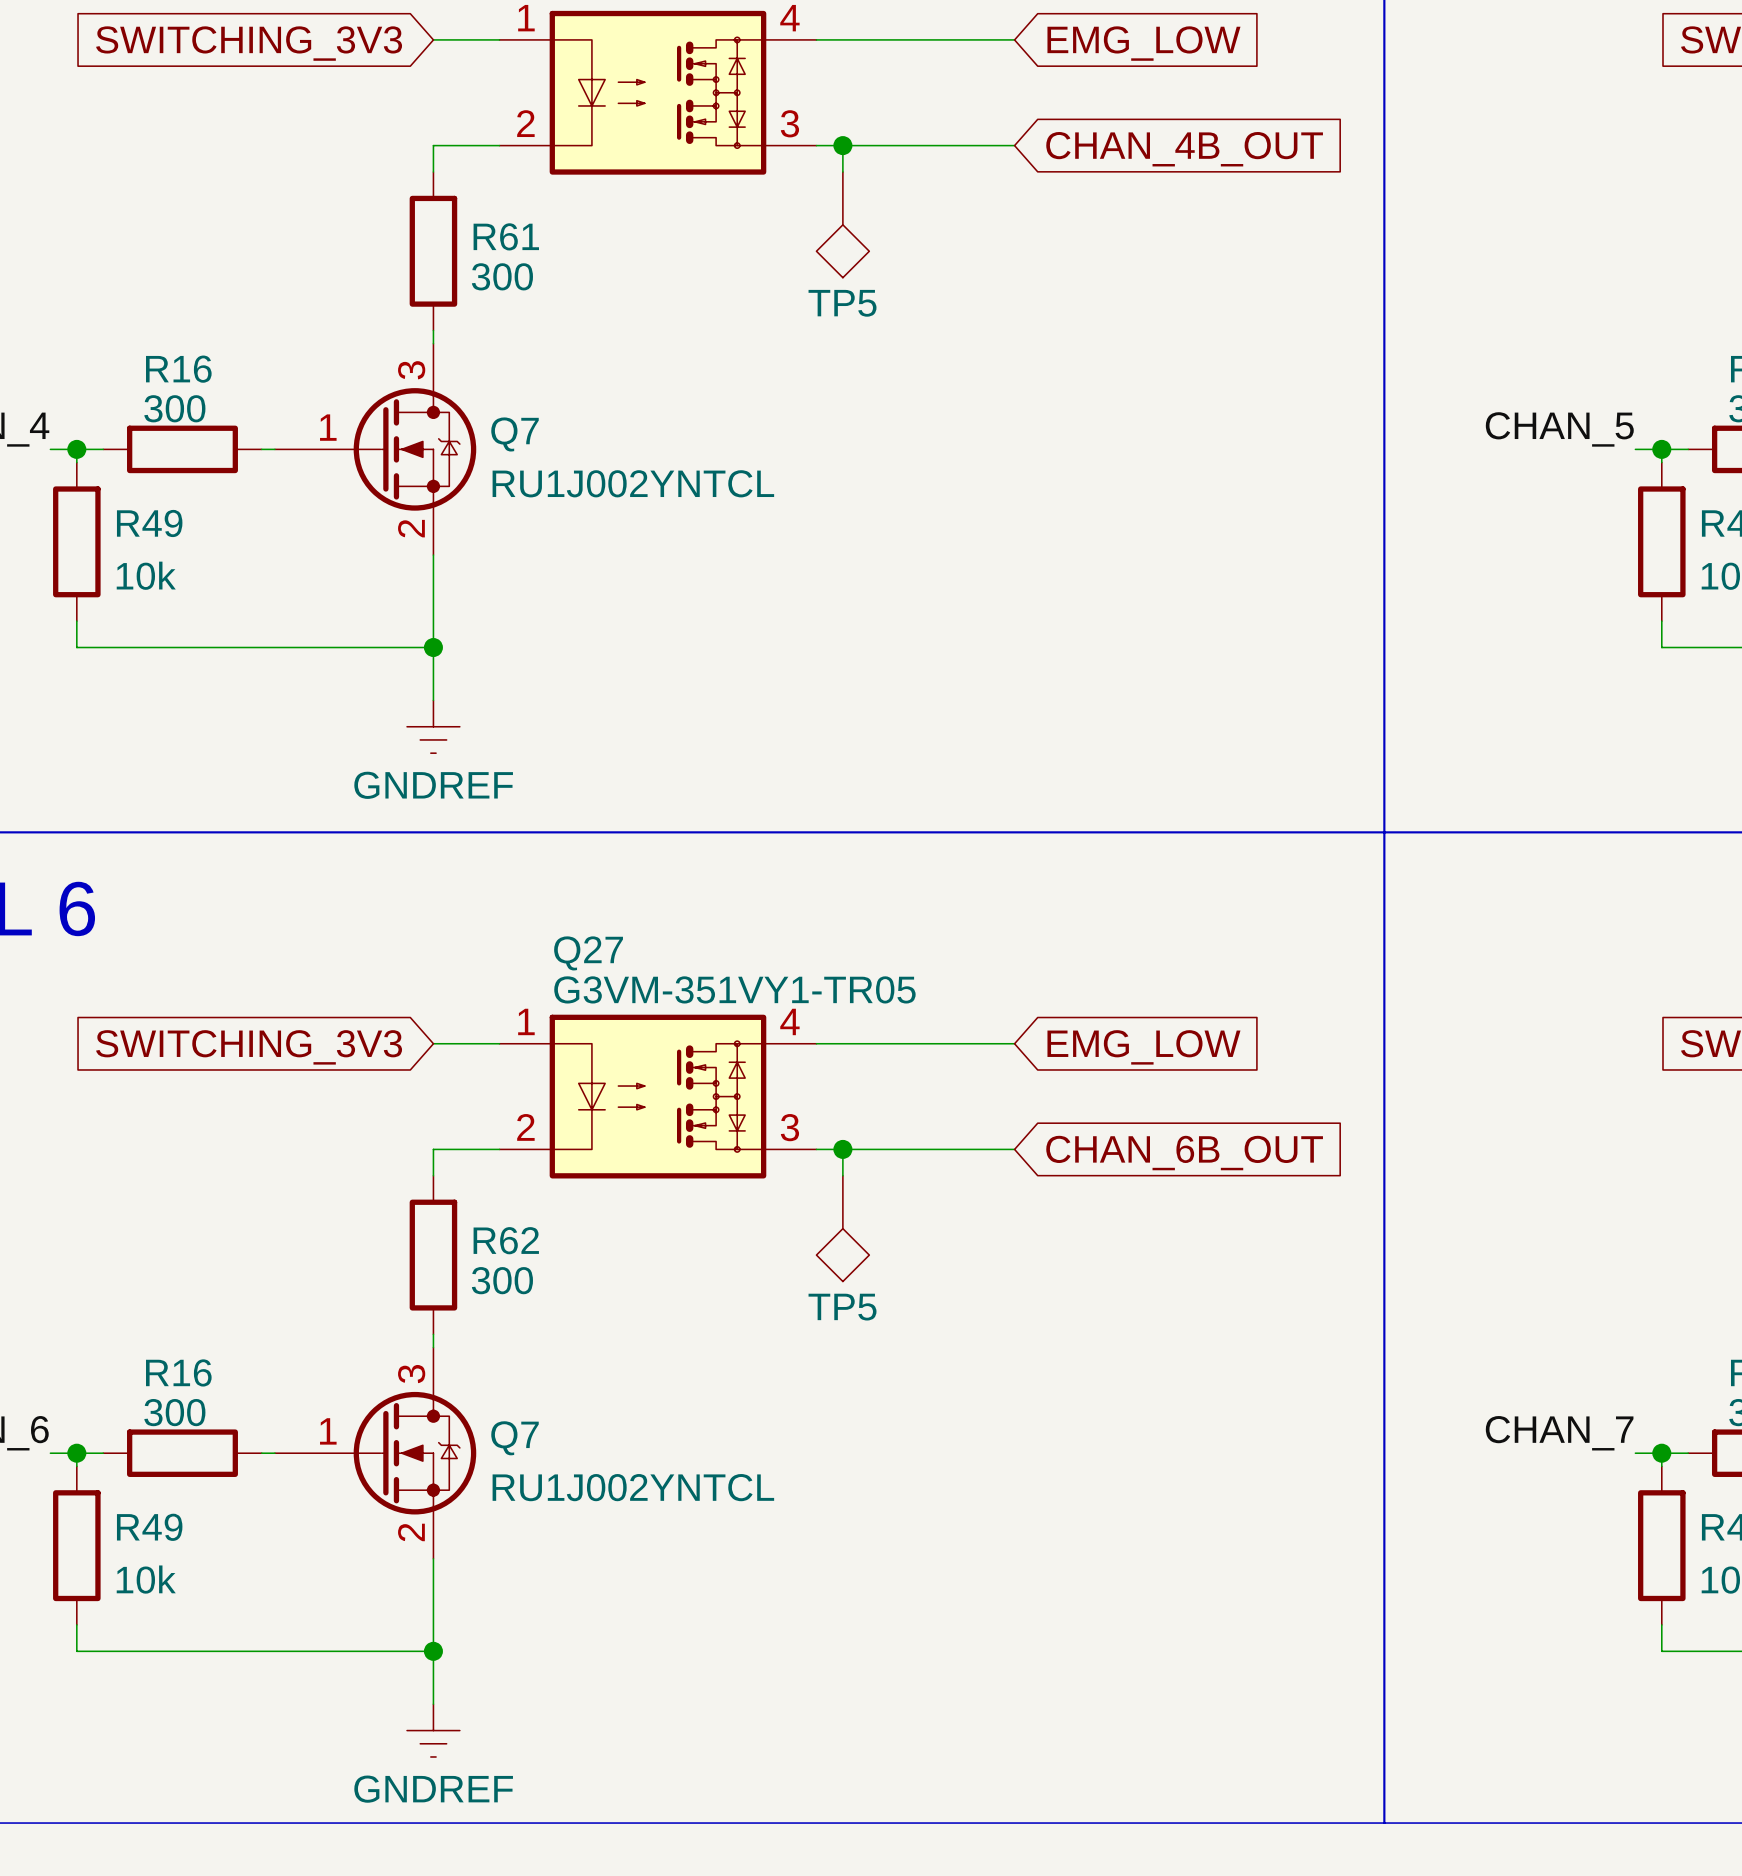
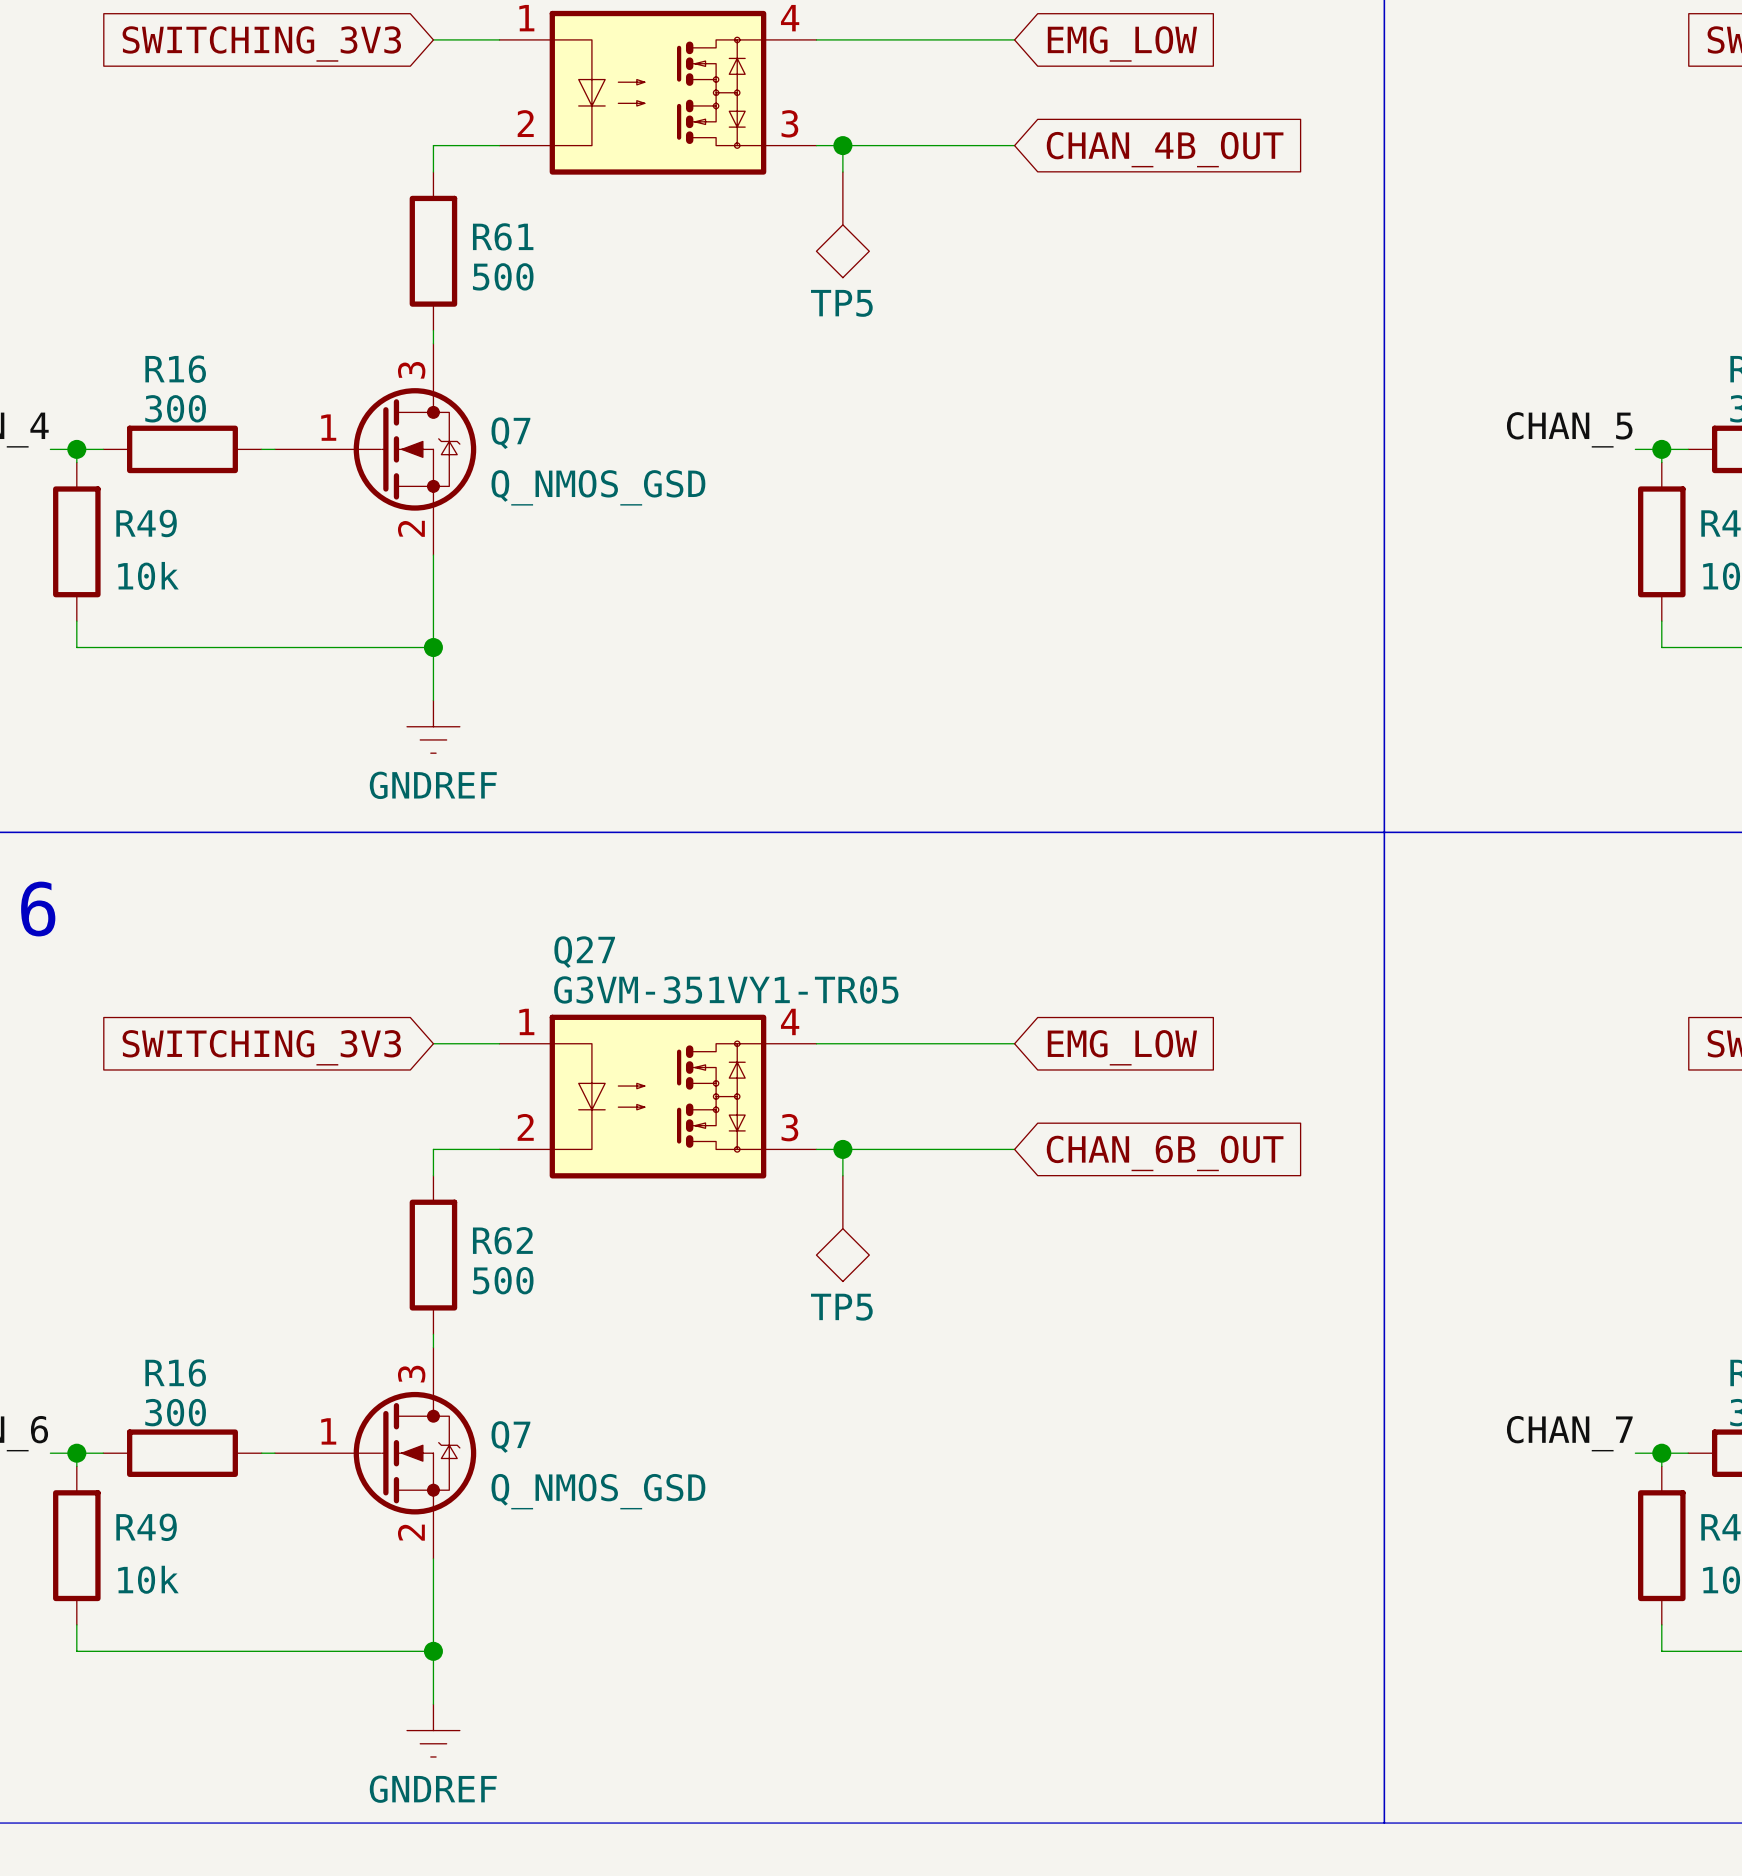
R61 value: 300 (502, 276) -> 500 (503, 276)
Q7 value: RU1J002YNTCL (633, 483) -> Q_NMOS_GSD (598, 487)
R62 value: 300 (502, 1280) -> 500 (503, 1280)
Q7 value: RU1J002YNTCL (633, 1487) -> Q_NMOS_GSD (598, 1491)

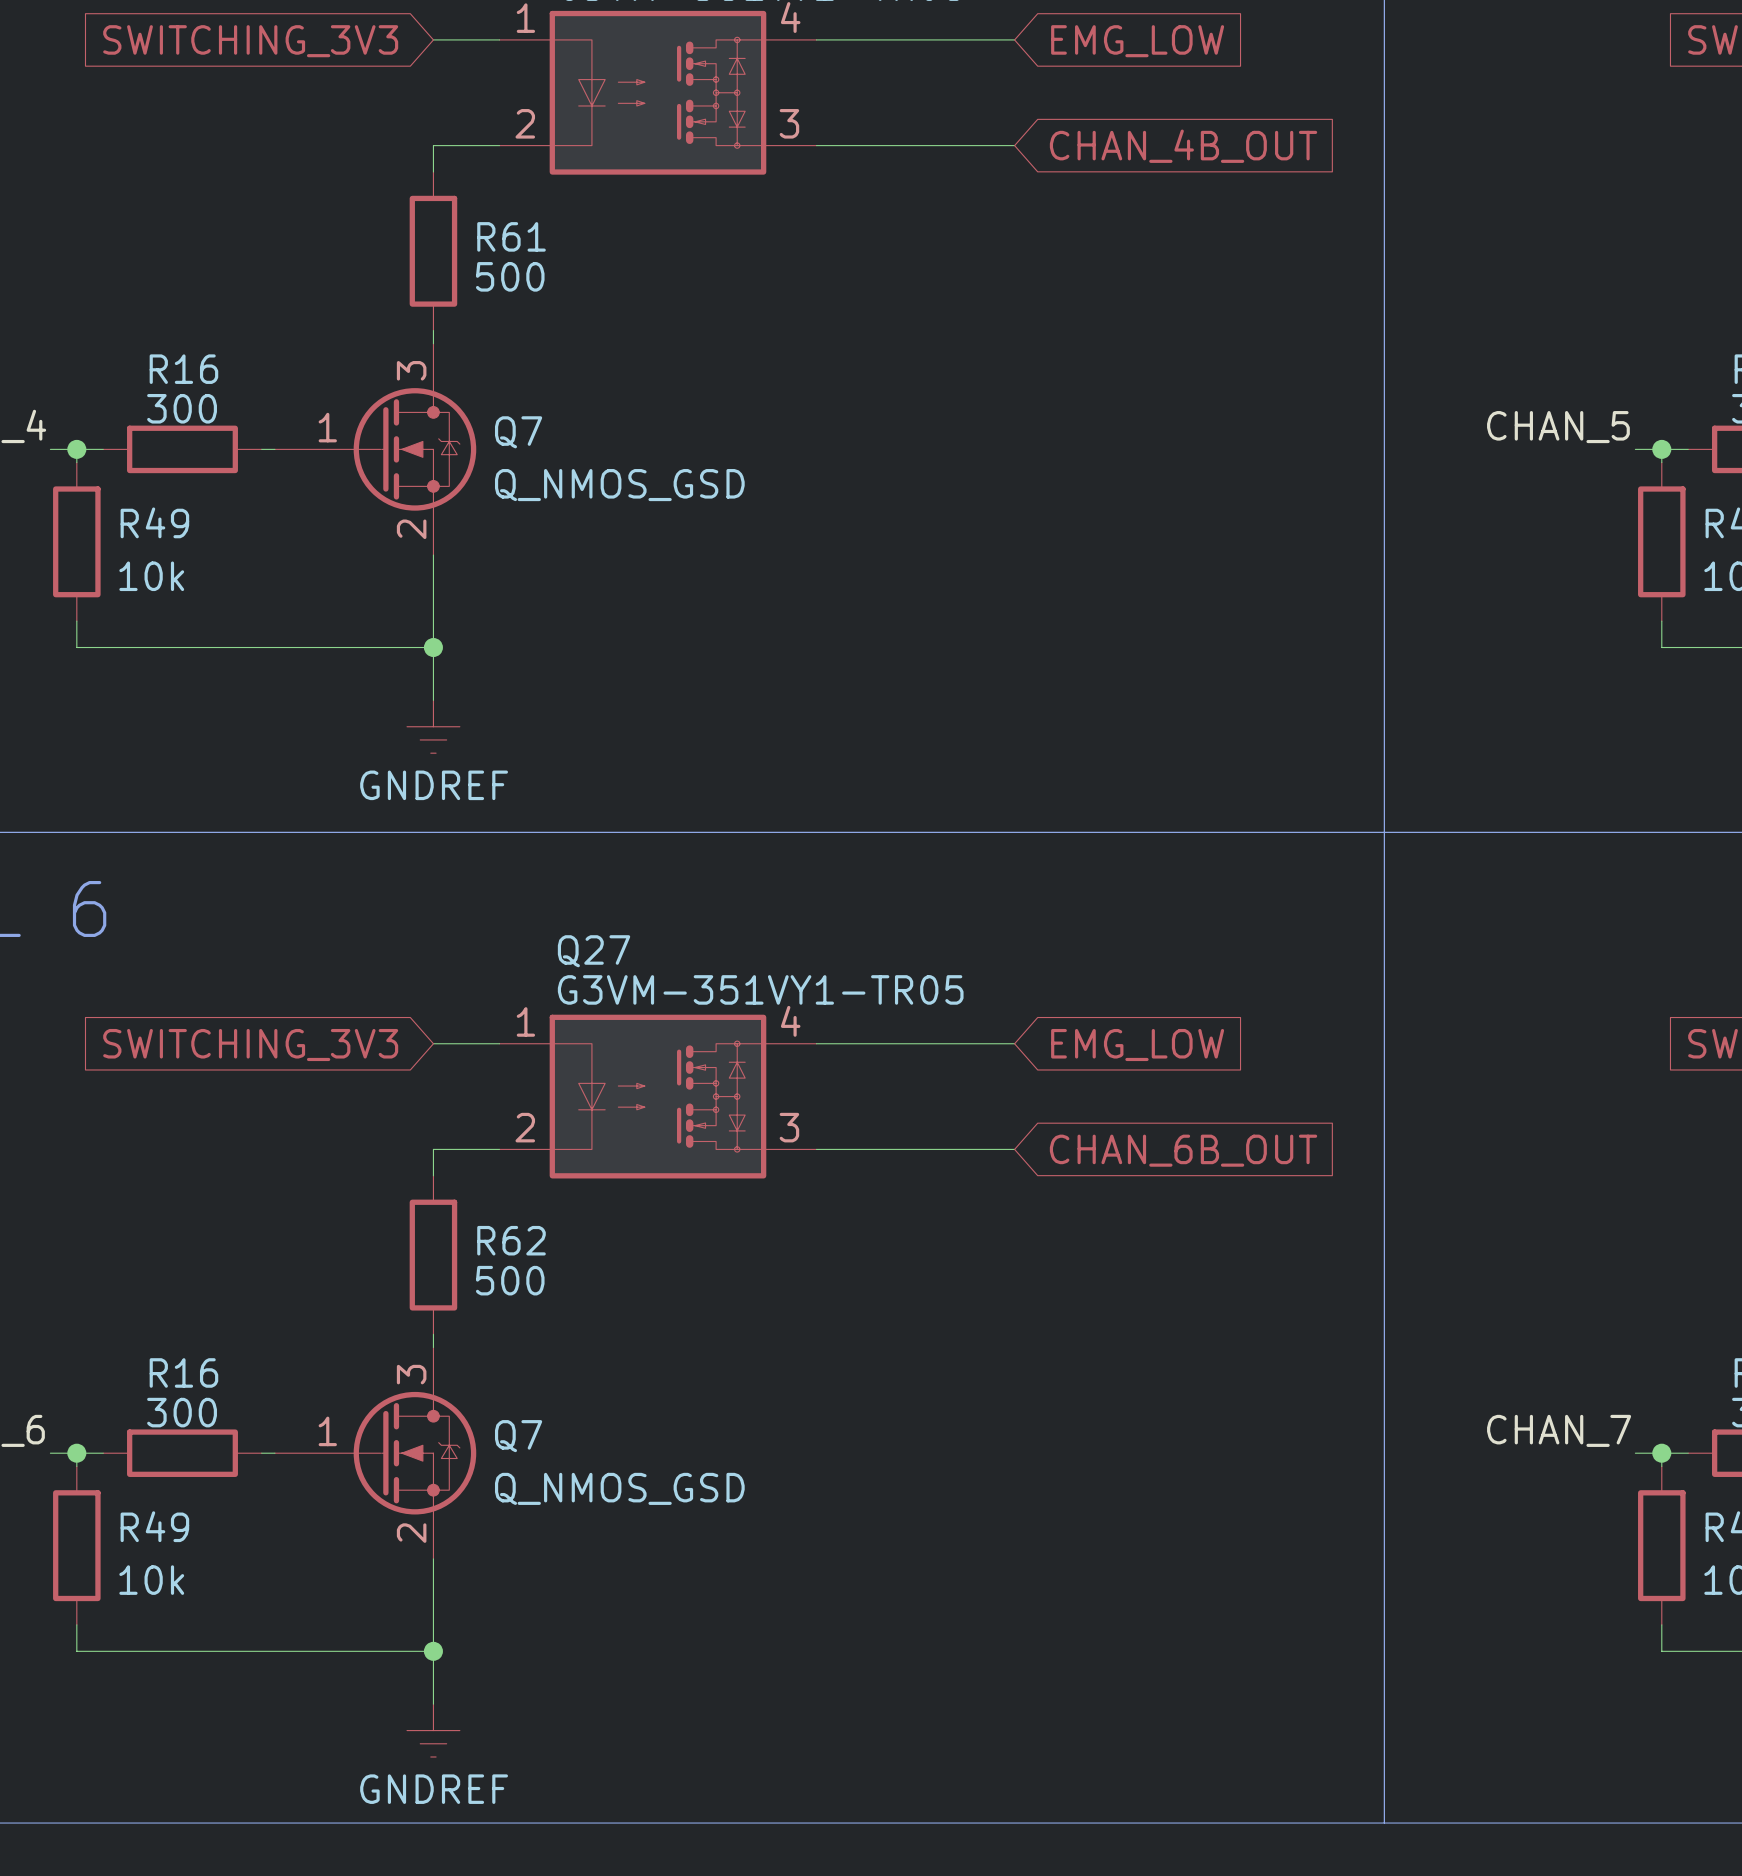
wire: (842, 145) (842, 172) -> none
junction: (842, 145) -> none
TP5: (842, 224) -> none
wire: (842, 1149) (842, 1175) -> none
junction: (842, 1149) -> none
TP5: (842, 1228) -> none

